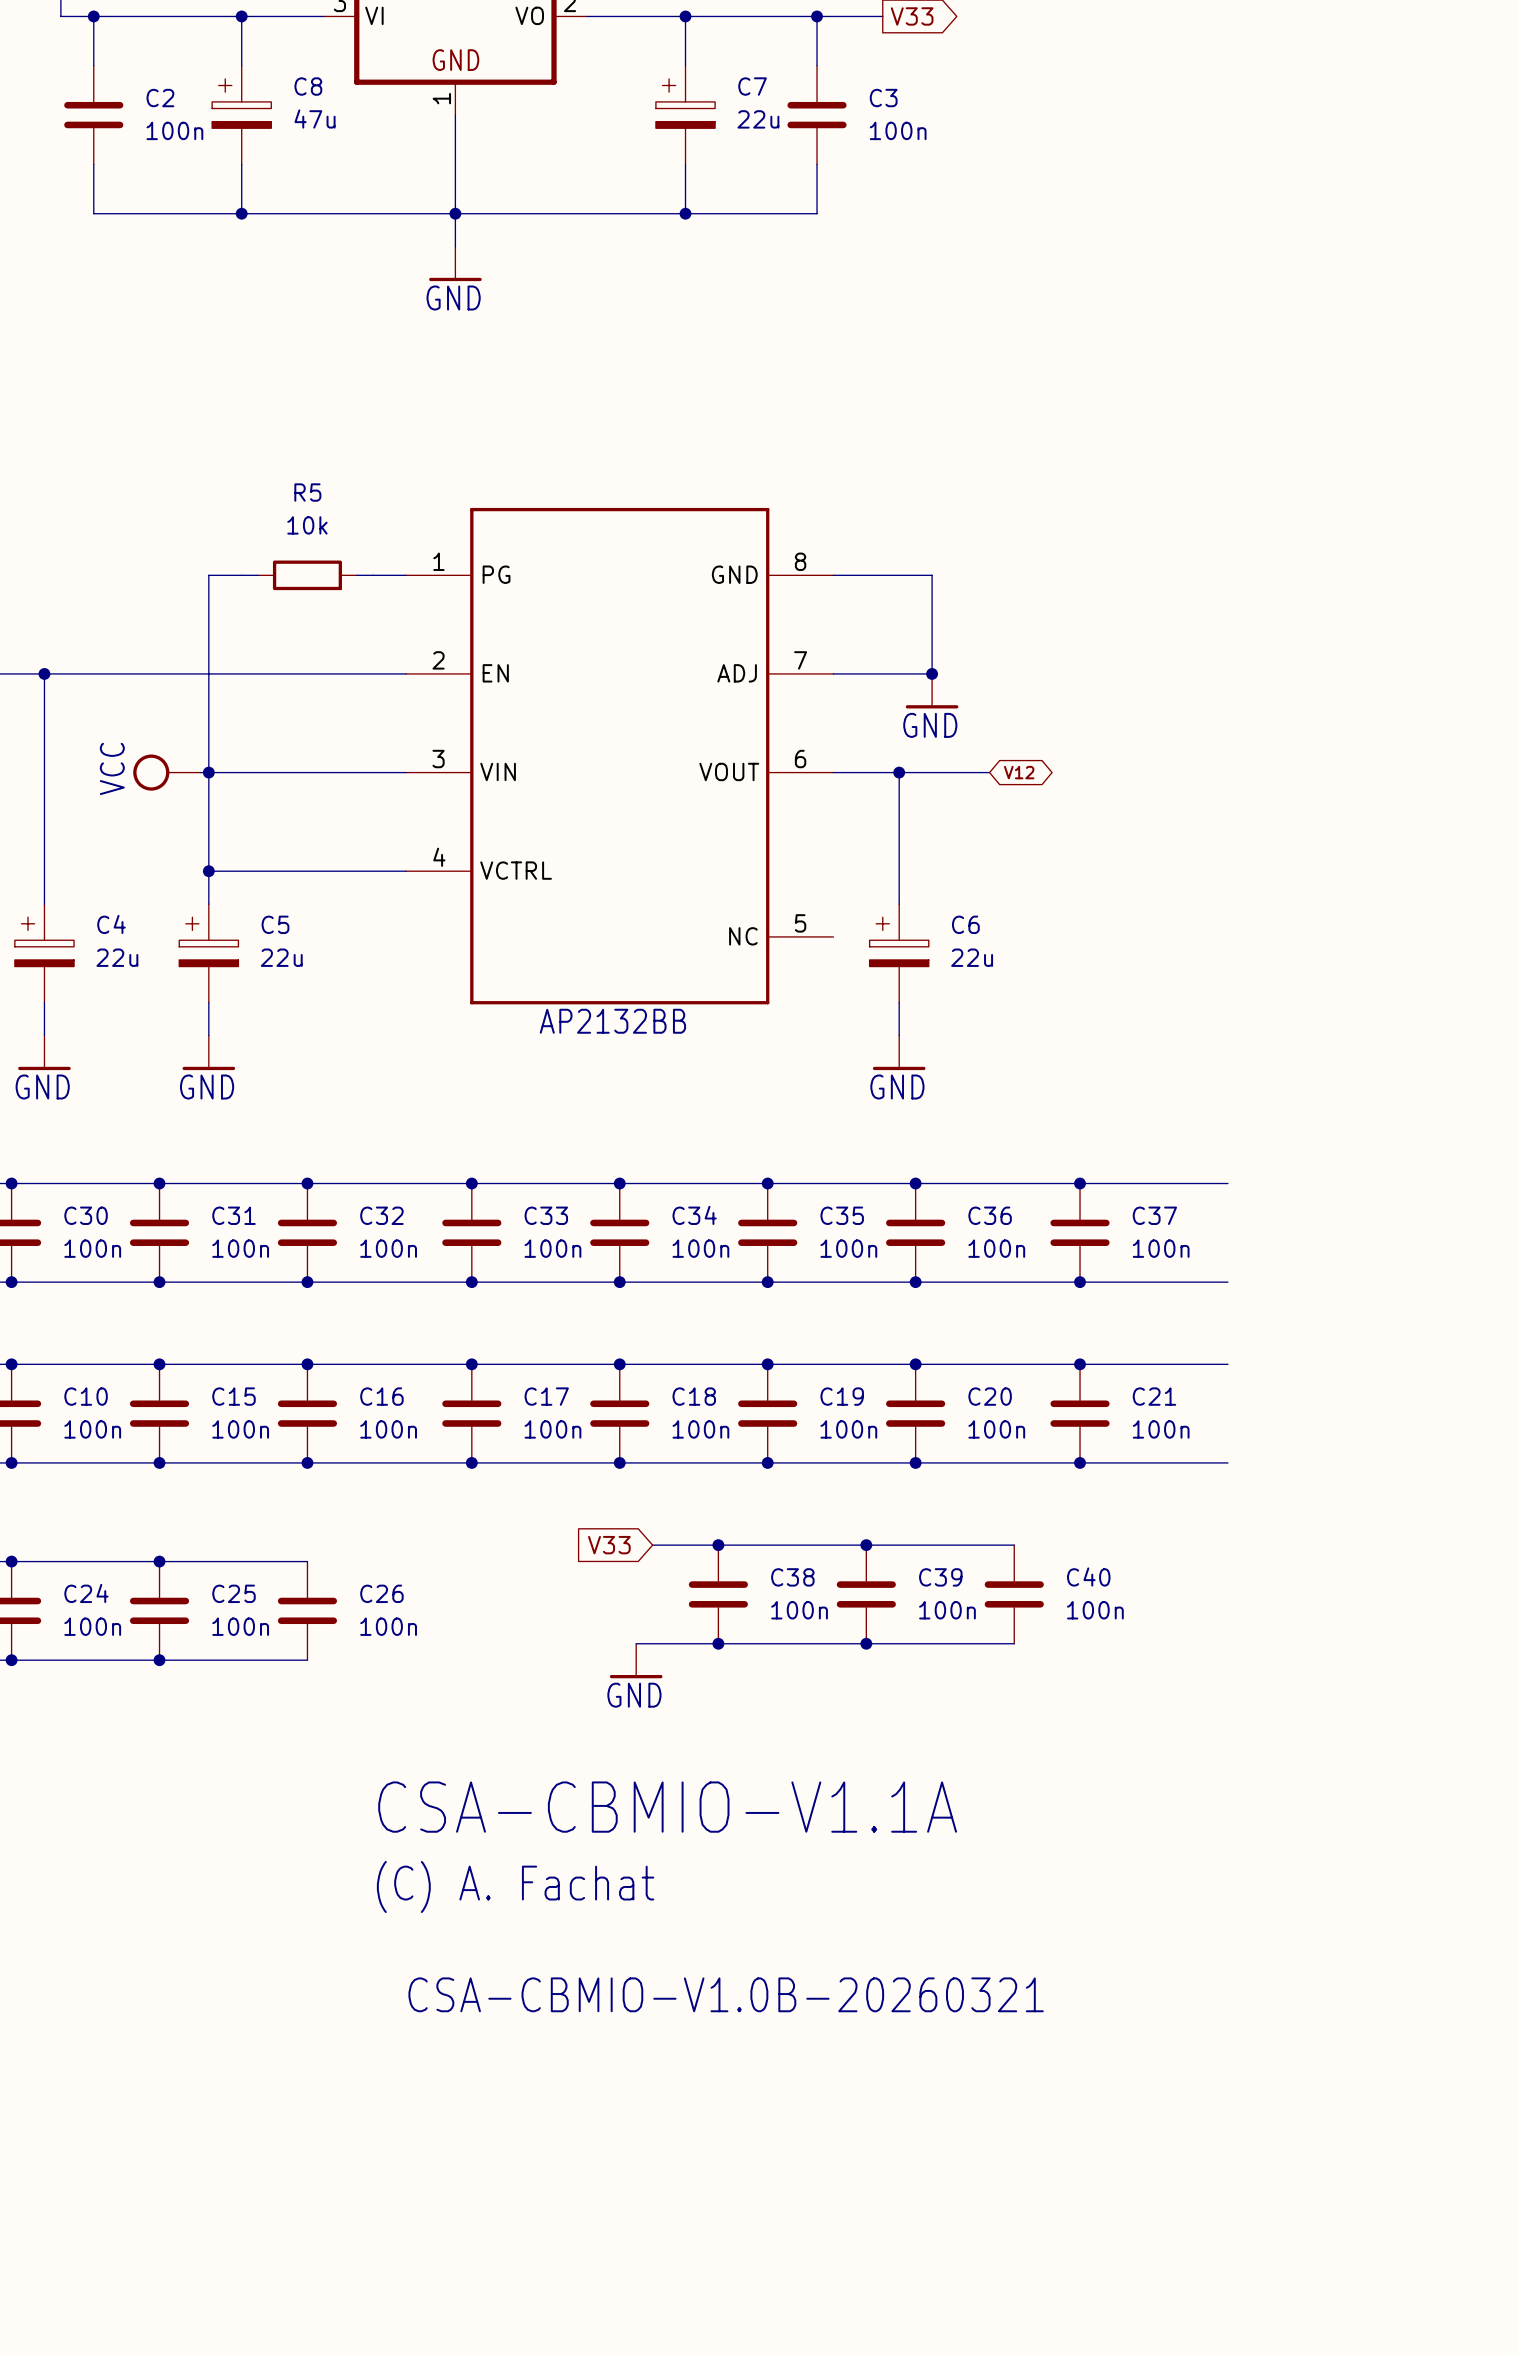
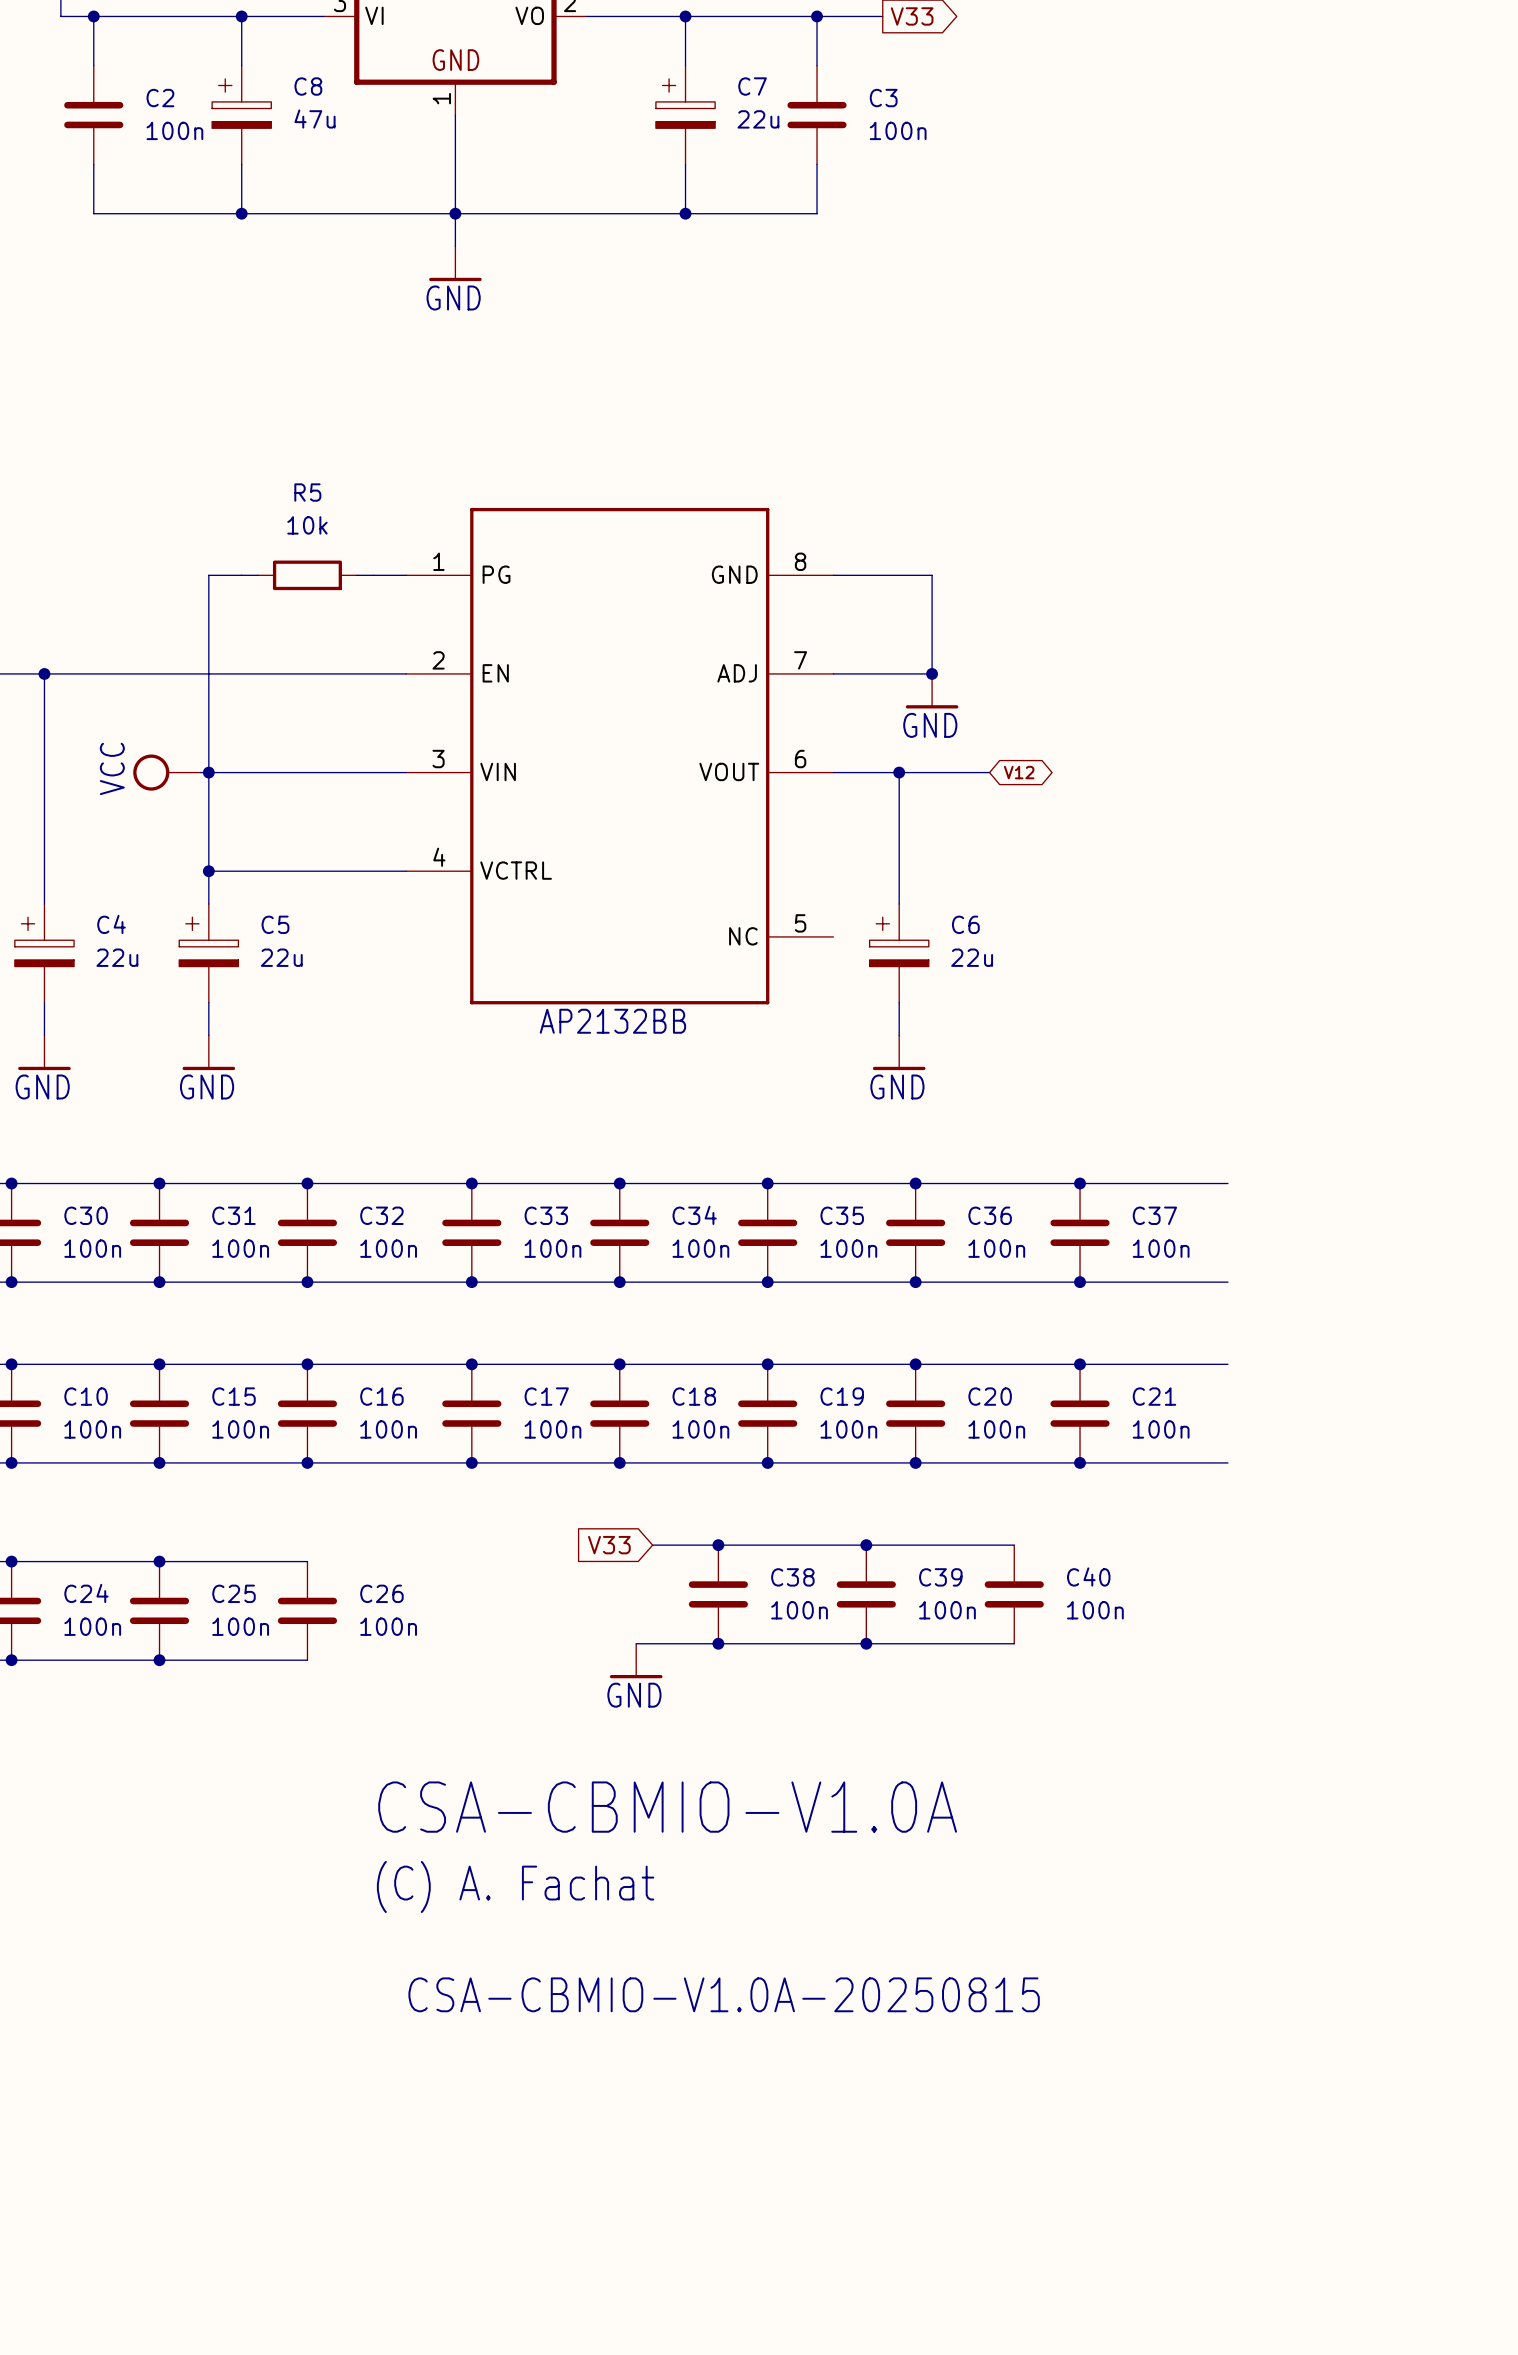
text: CSA-CBMIO-V1.1A (667, 1807) -> CSA-CBMIO-V1.0A (667, 1807)
text: CSA-CBMIO-V1.0B-20260321 (726, 1994) -> CSA-CBMIO-V1.0A-20250815 (724, 1994)

